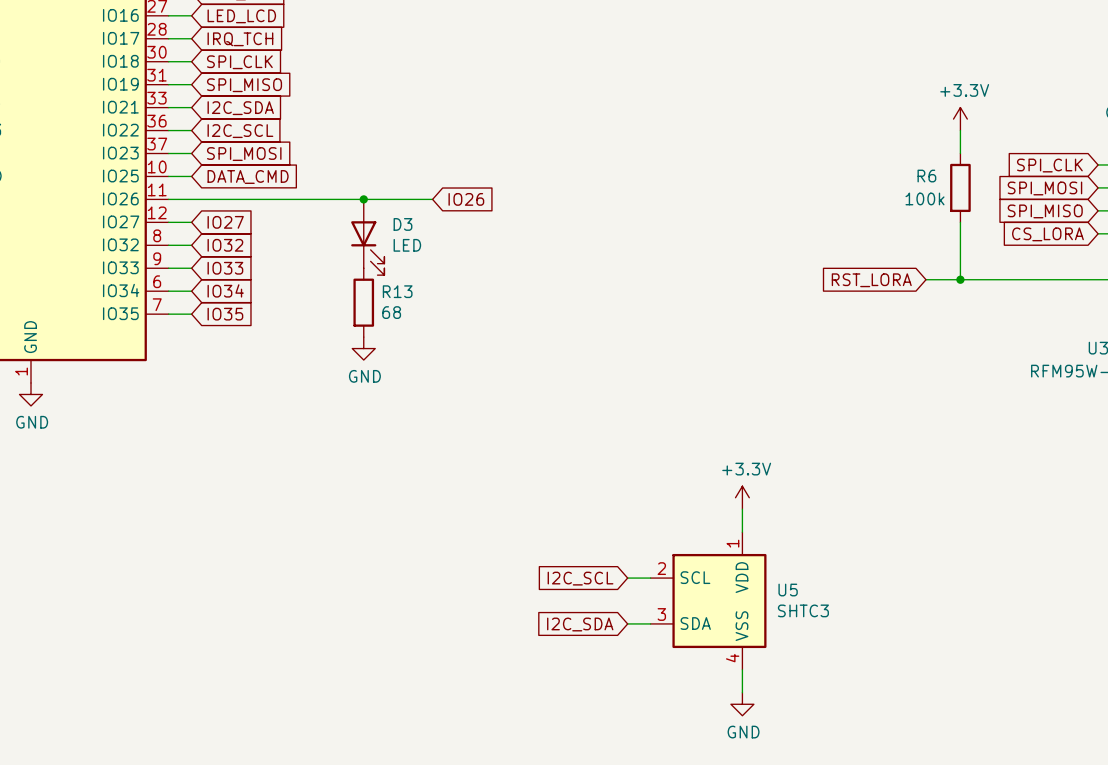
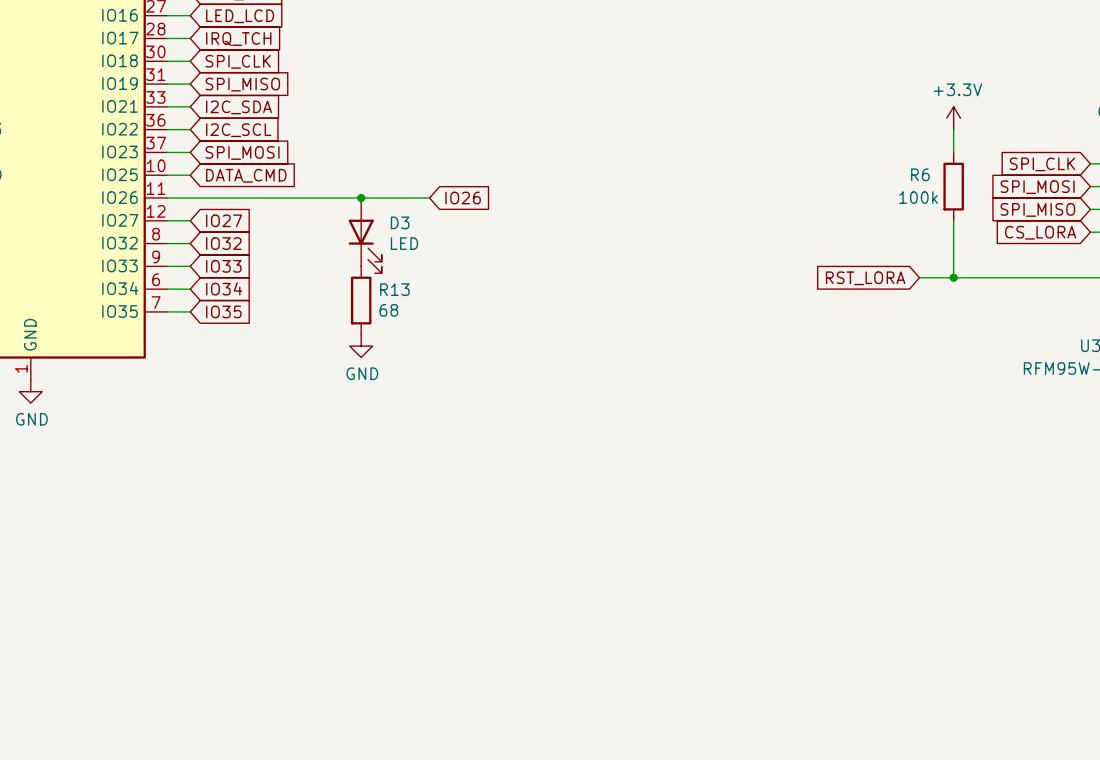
power symbol: +3.3V (742, 497) -> none
wire: (742, 509) (742, 532) -> none
global label: I2C_SCL (580, 578) -> none
wire: (627, 578) (650, 578) -> none
U5: SHTC3 (708, 601) -> none
wire: (627, 623) (650, 623) -> none
global label: I2C_SDA (580, 624) -> none
wire: (742, 669) (742, 692) -> none
power symbol: GND (742, 704) -> none

